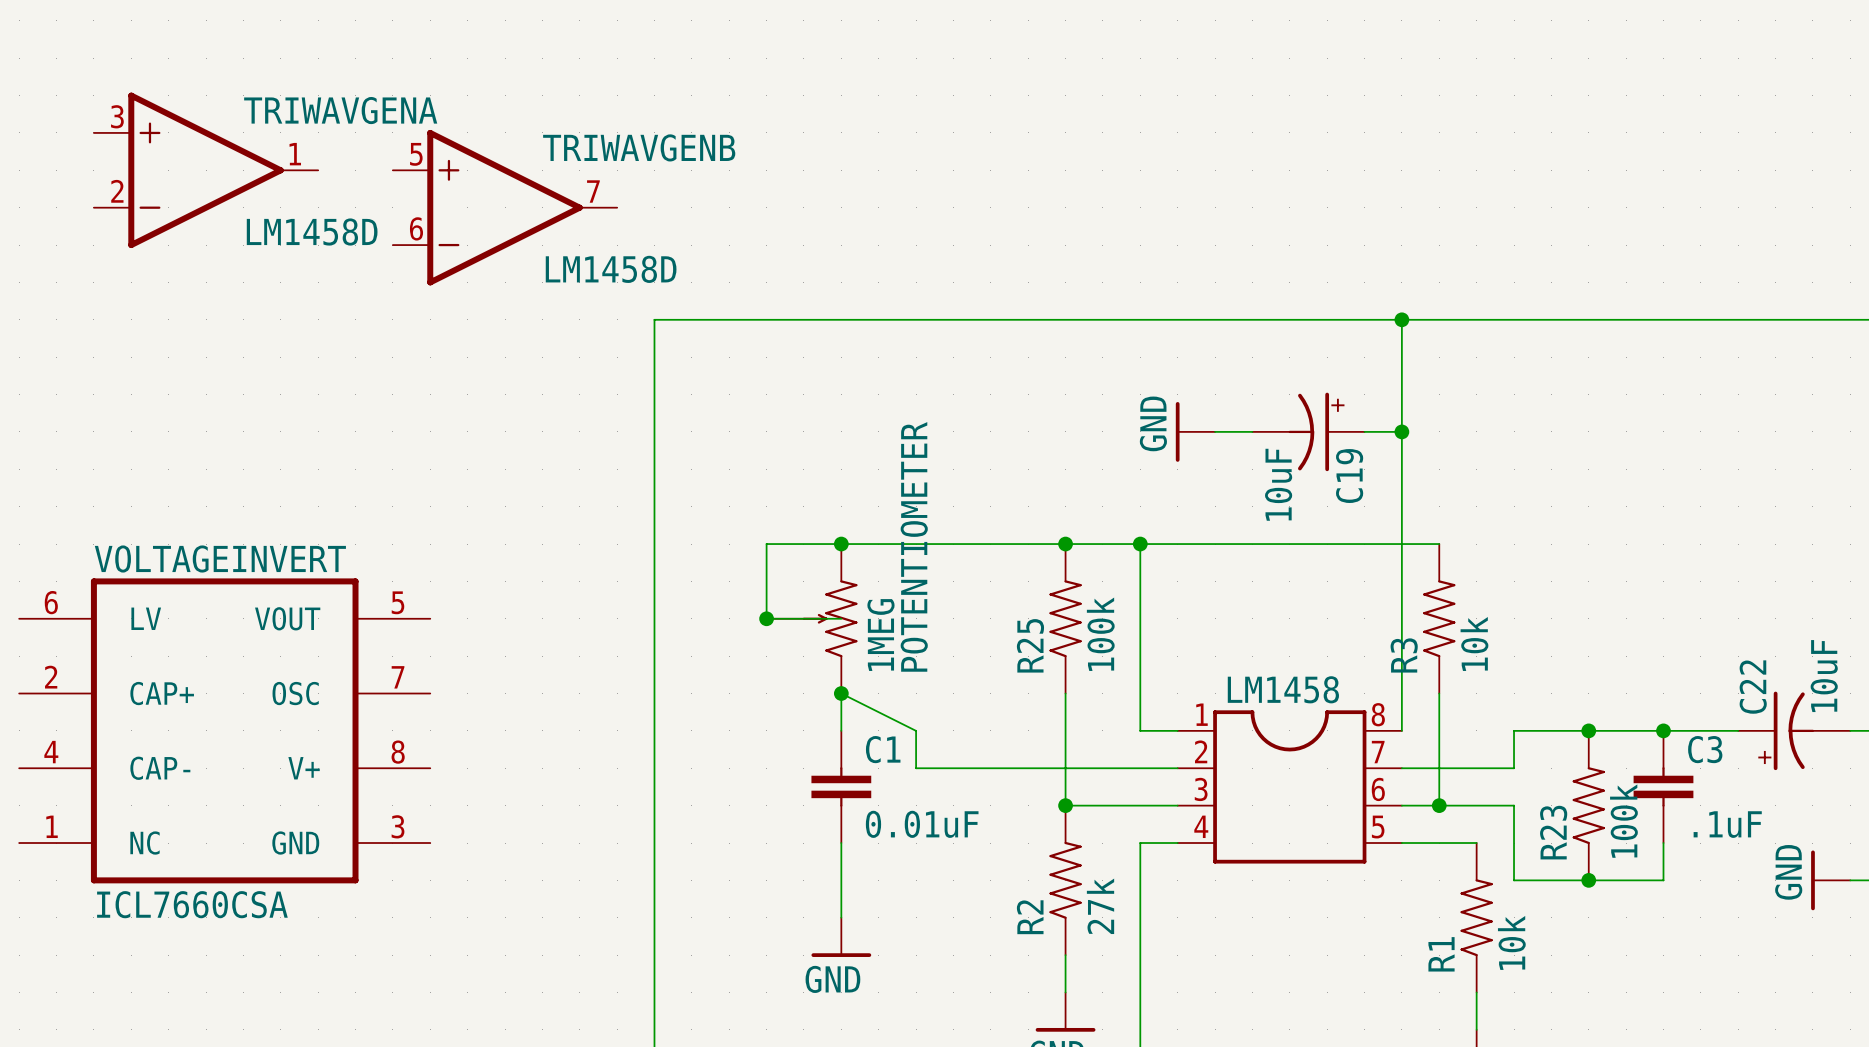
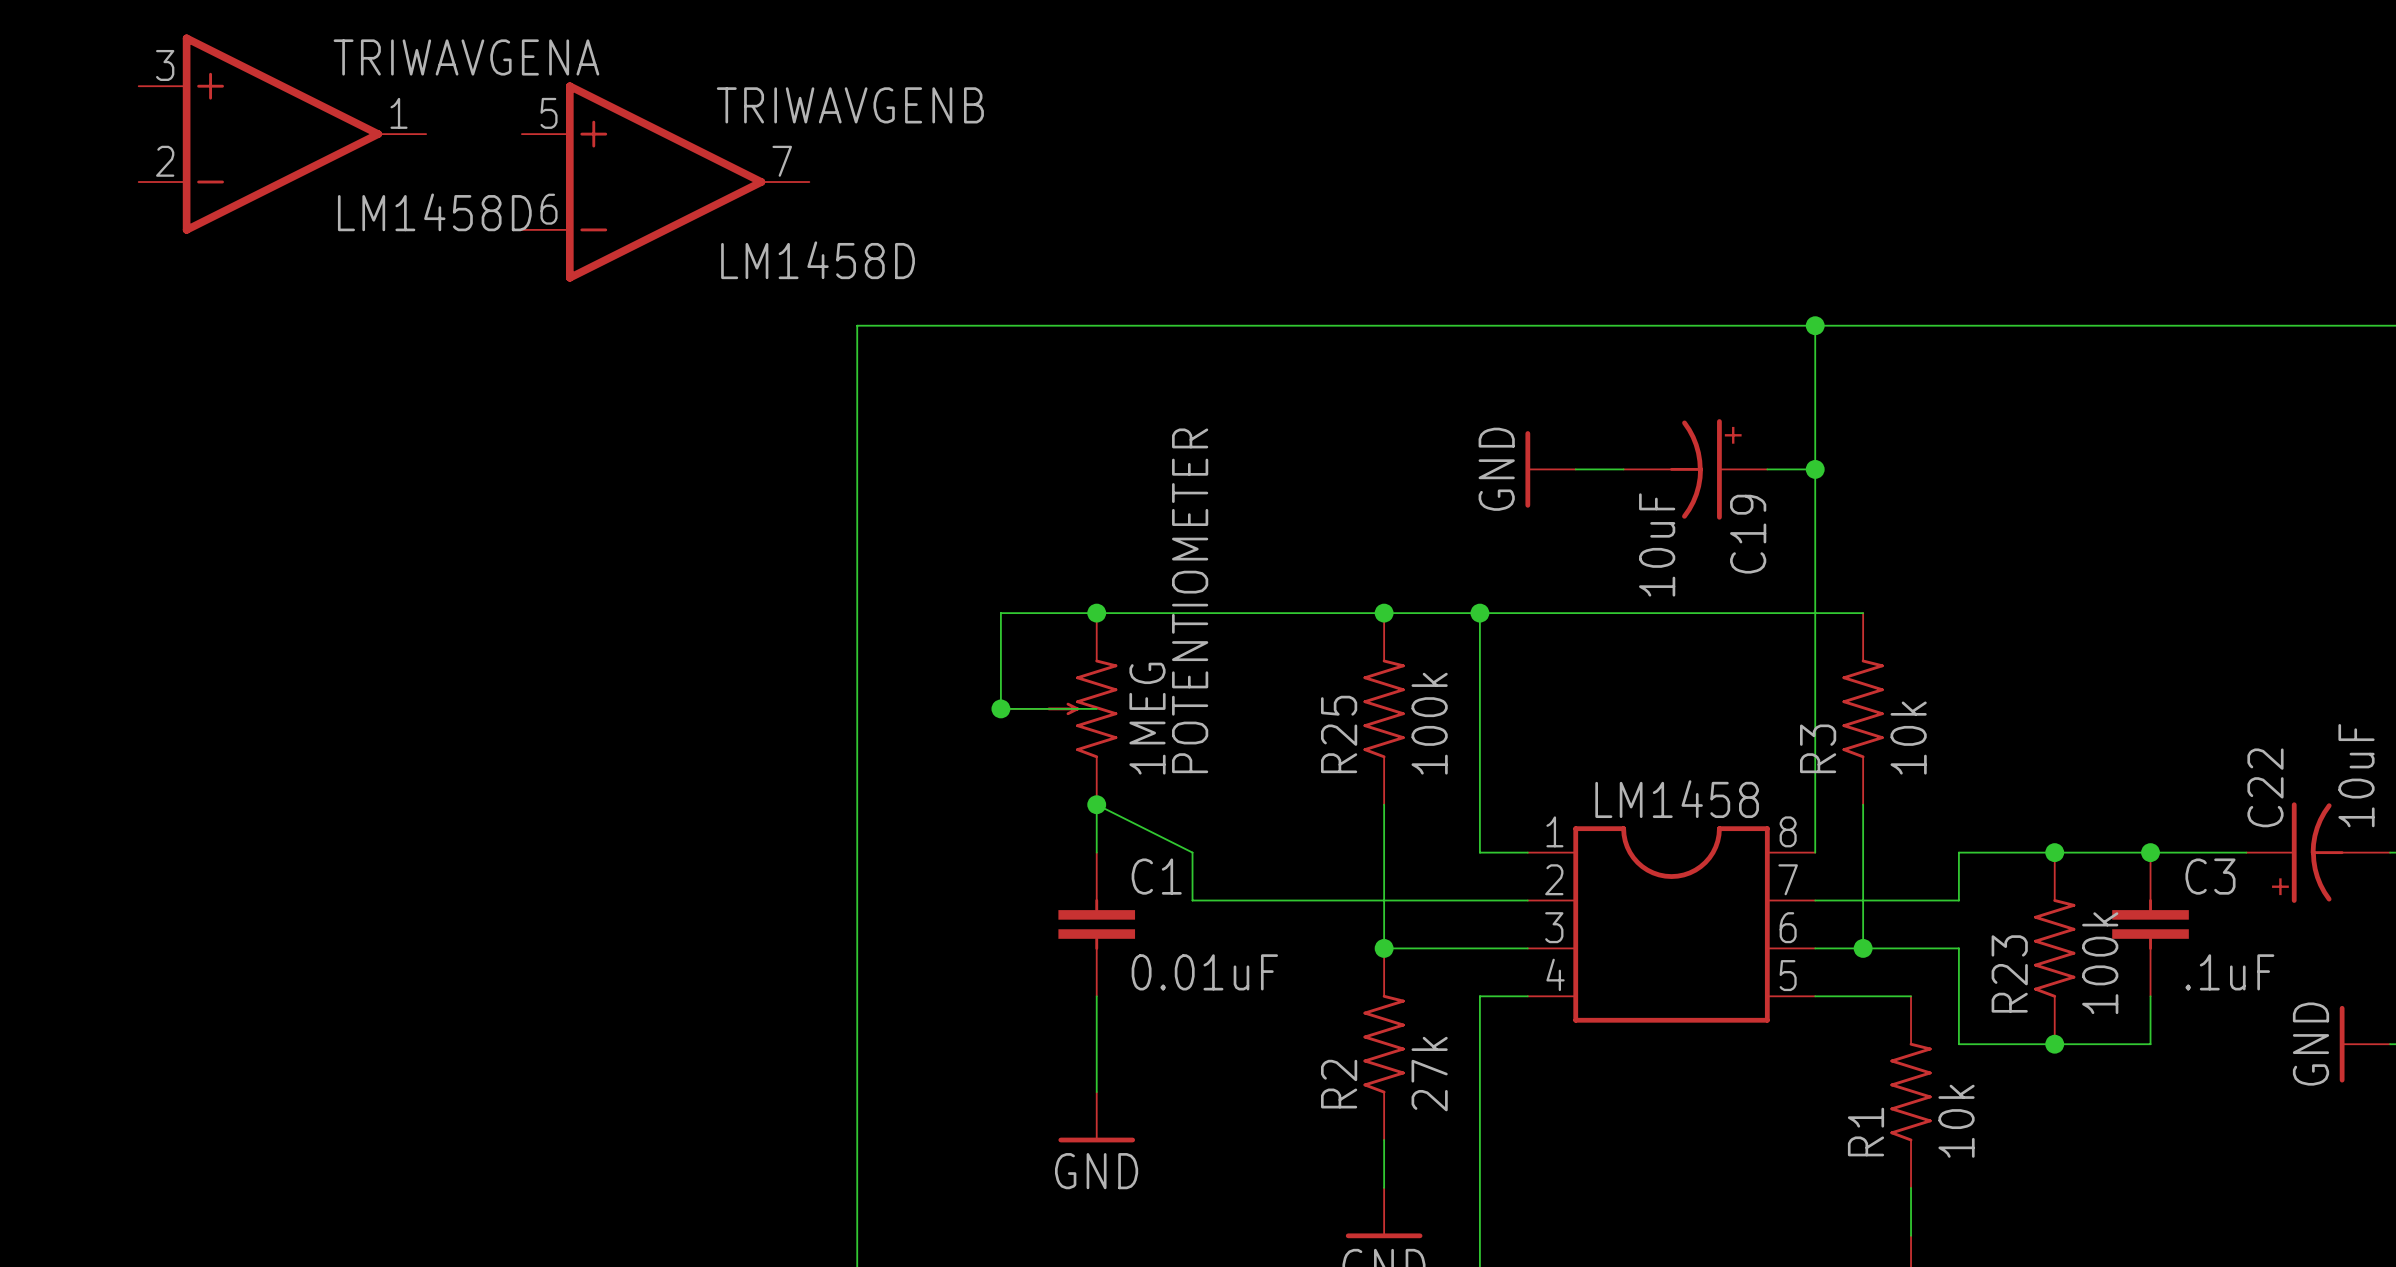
VOLTAGEINVERT: ICL7660CSA (224, 730) -> none

